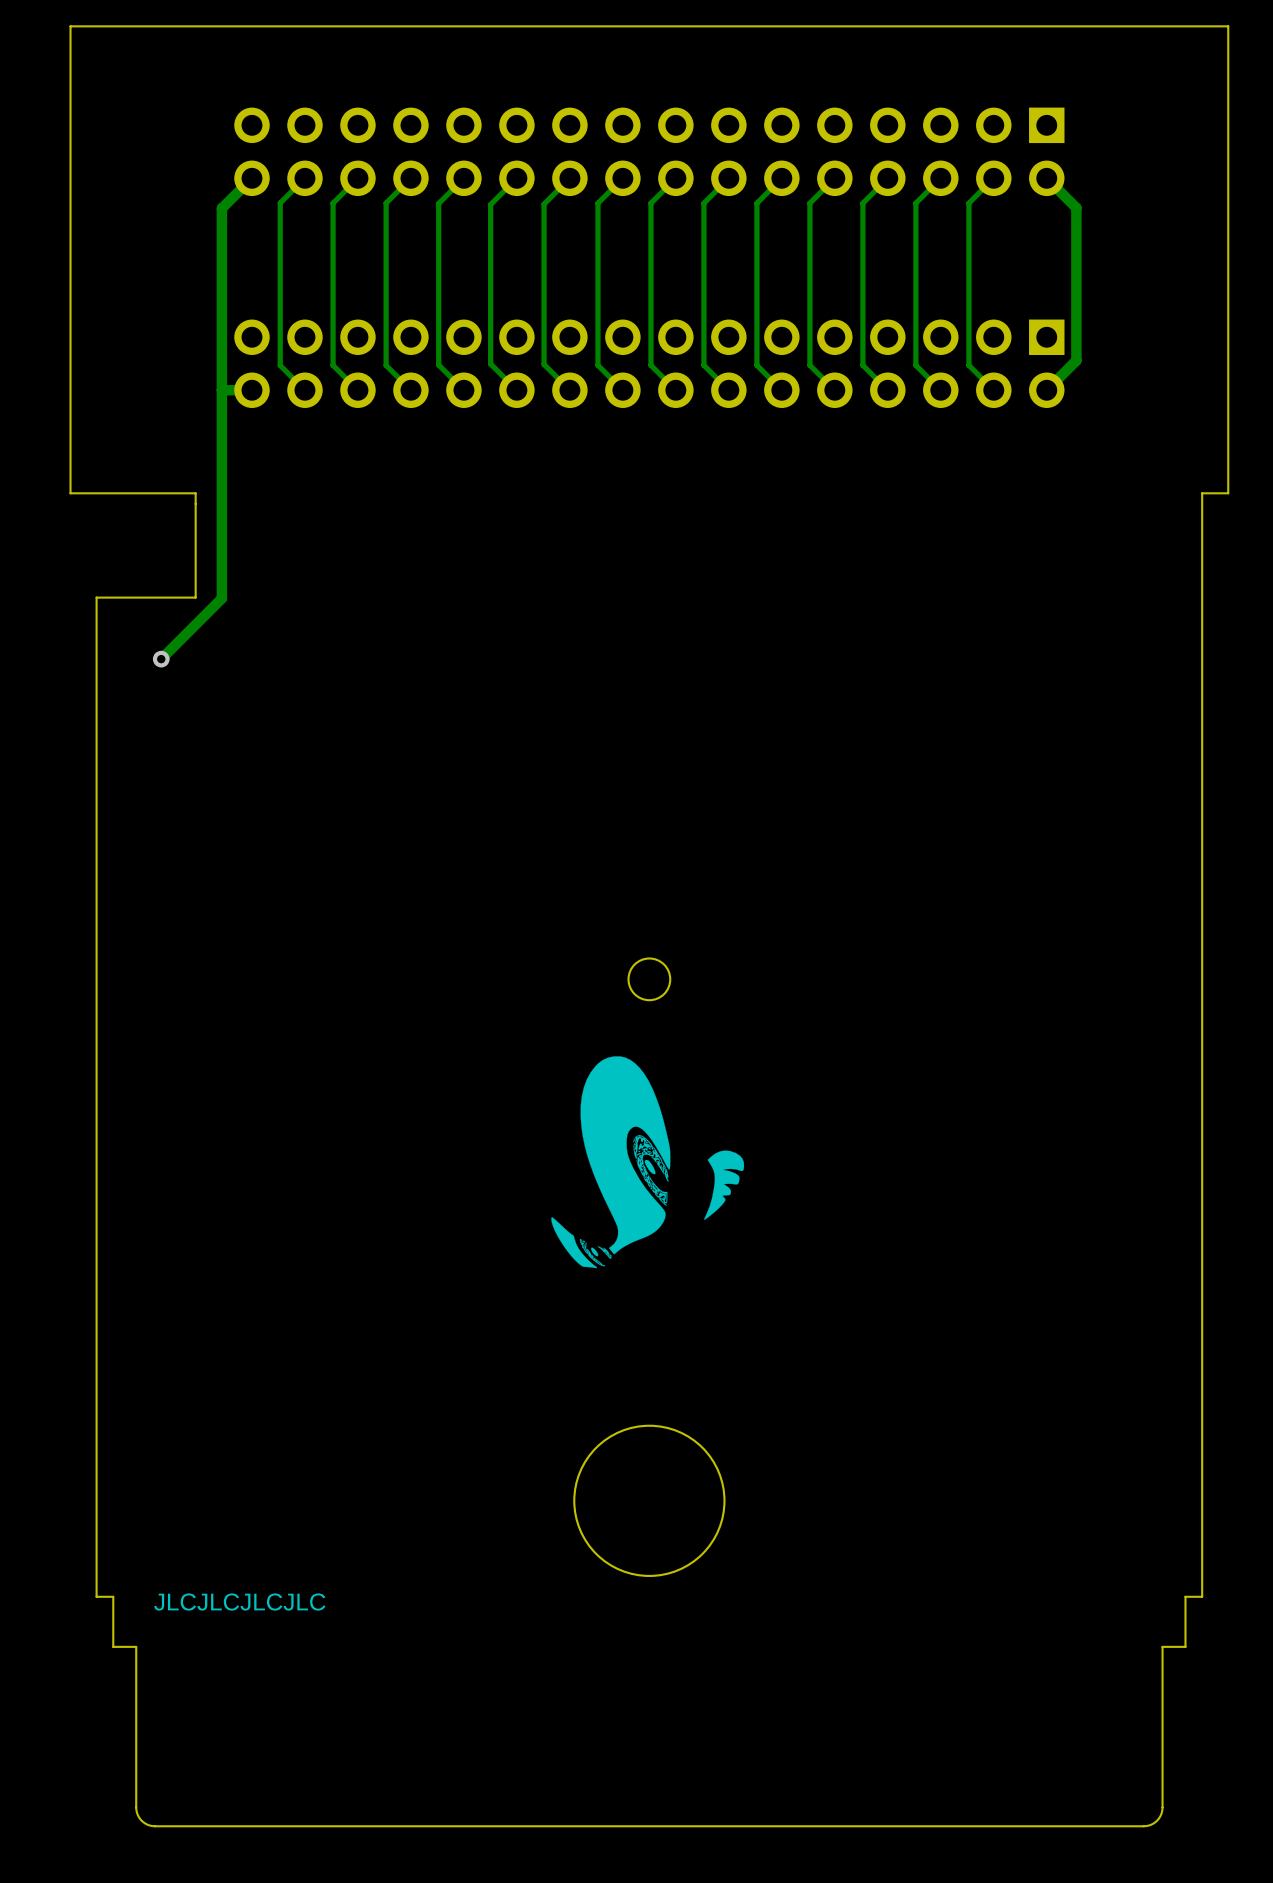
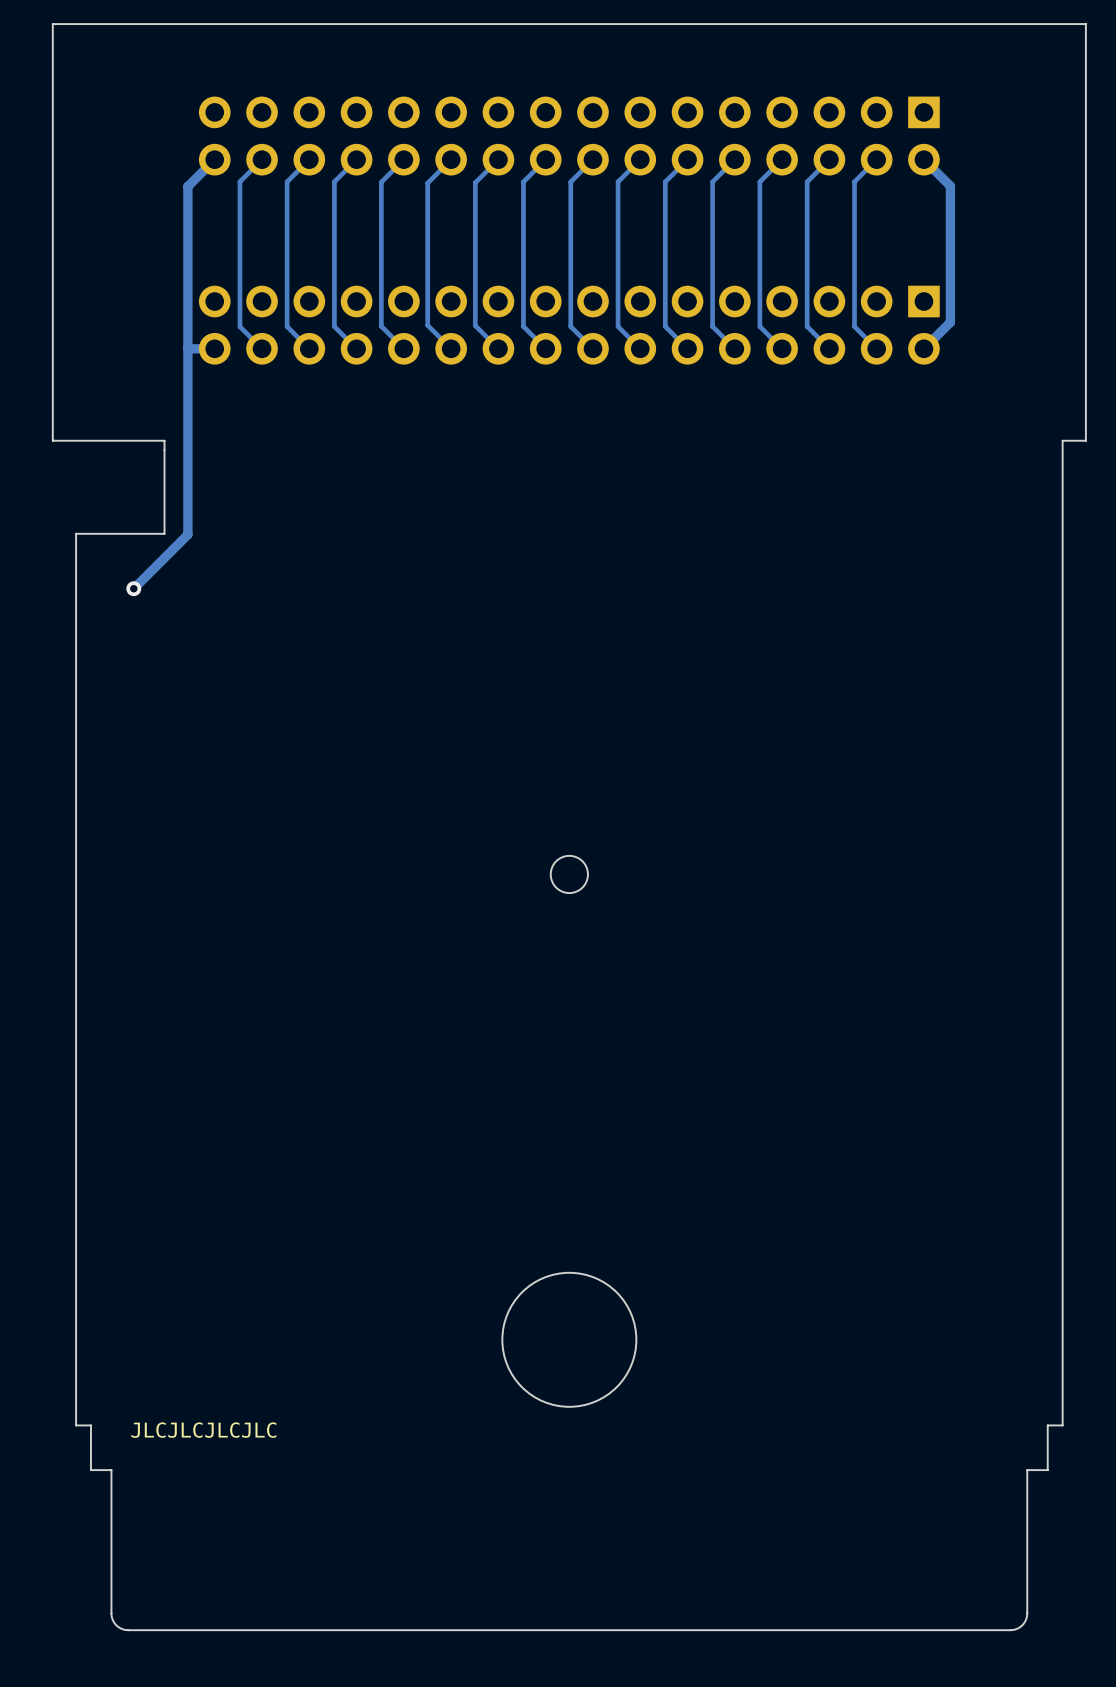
drawing: [551, 1056, 745, 1269] -> none

